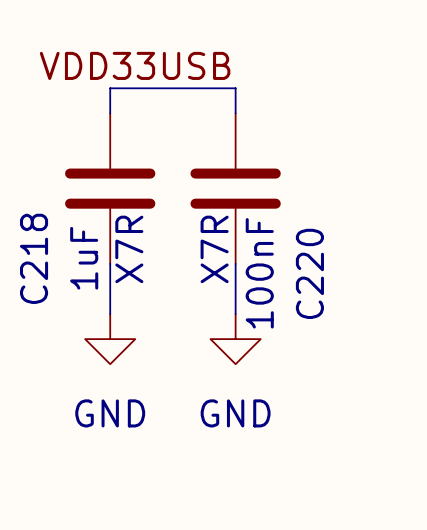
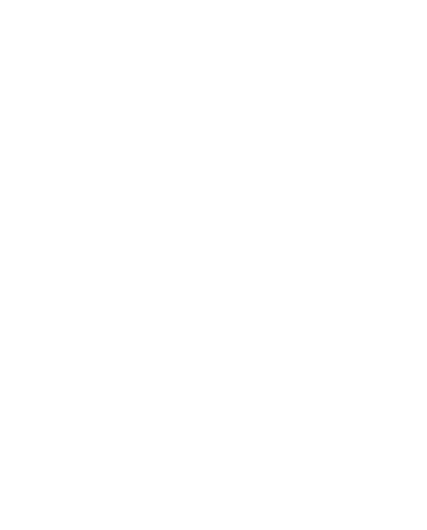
label: VDD33USB (135, 65) -> none
wire: (110, 113) (110, 88) (235, 88) (235, 113) -> none
C218: 1uF (110, 188) -> none
C220: 100nF (235, 188) -> none
wire: (110, 263) (110, 314) -> none
wire: (235, 263) (235, 314) -> none
power symbol: GND (110, 339) -> none
power symbol: GND (235, 339) -> none

